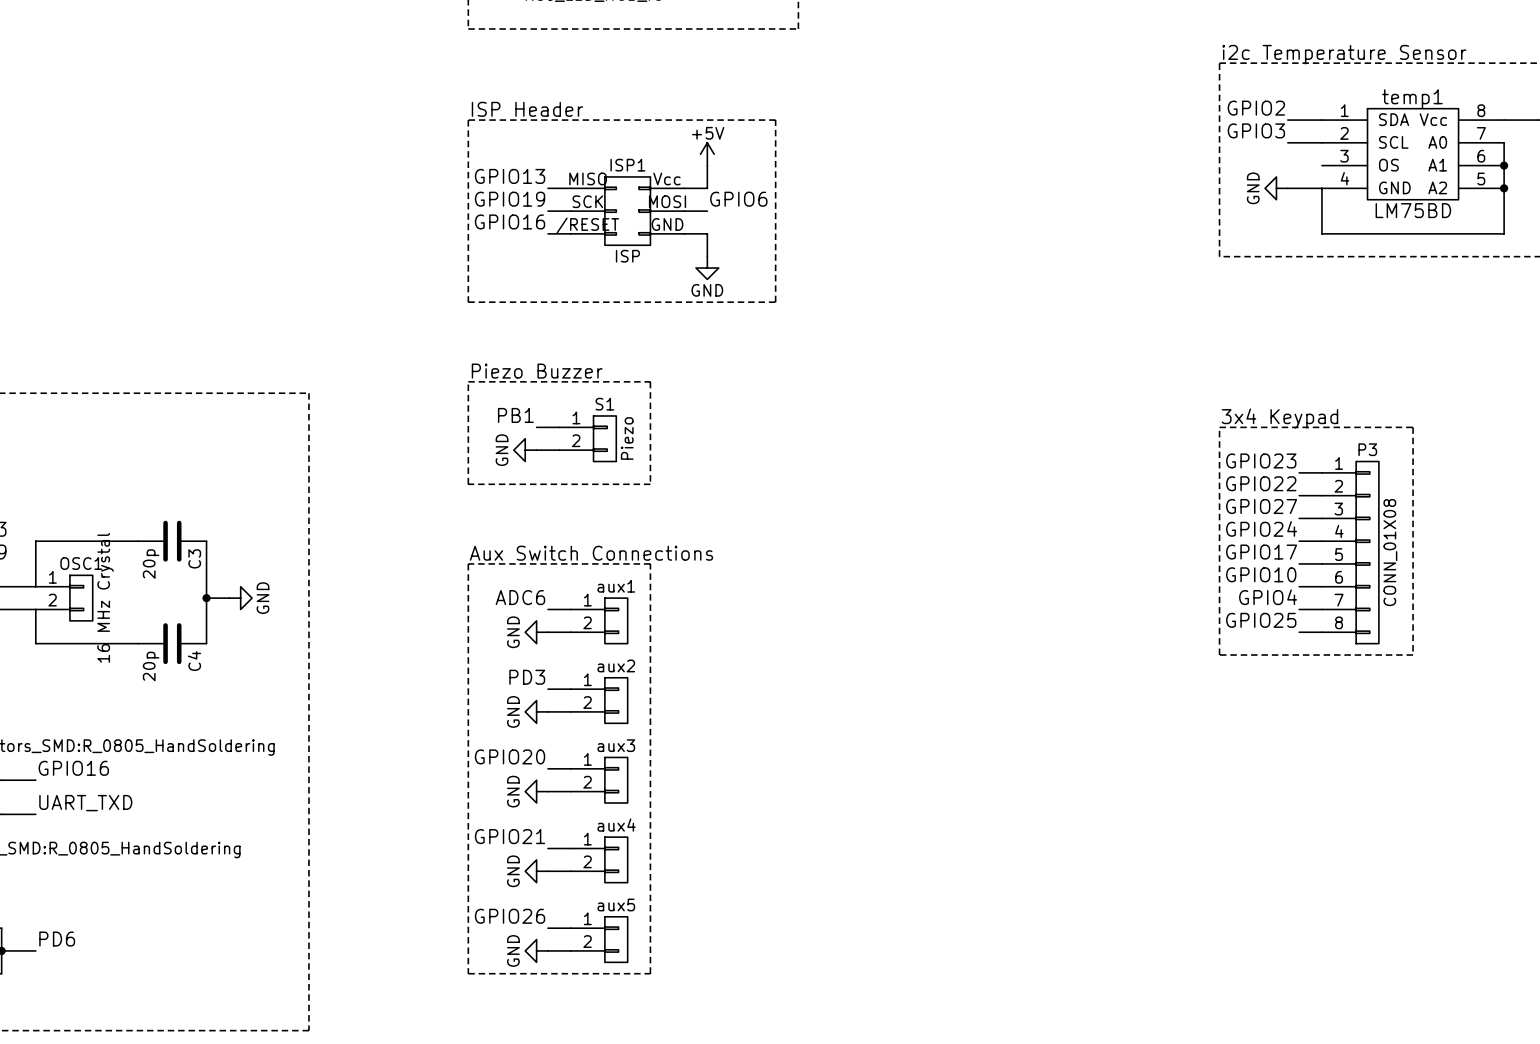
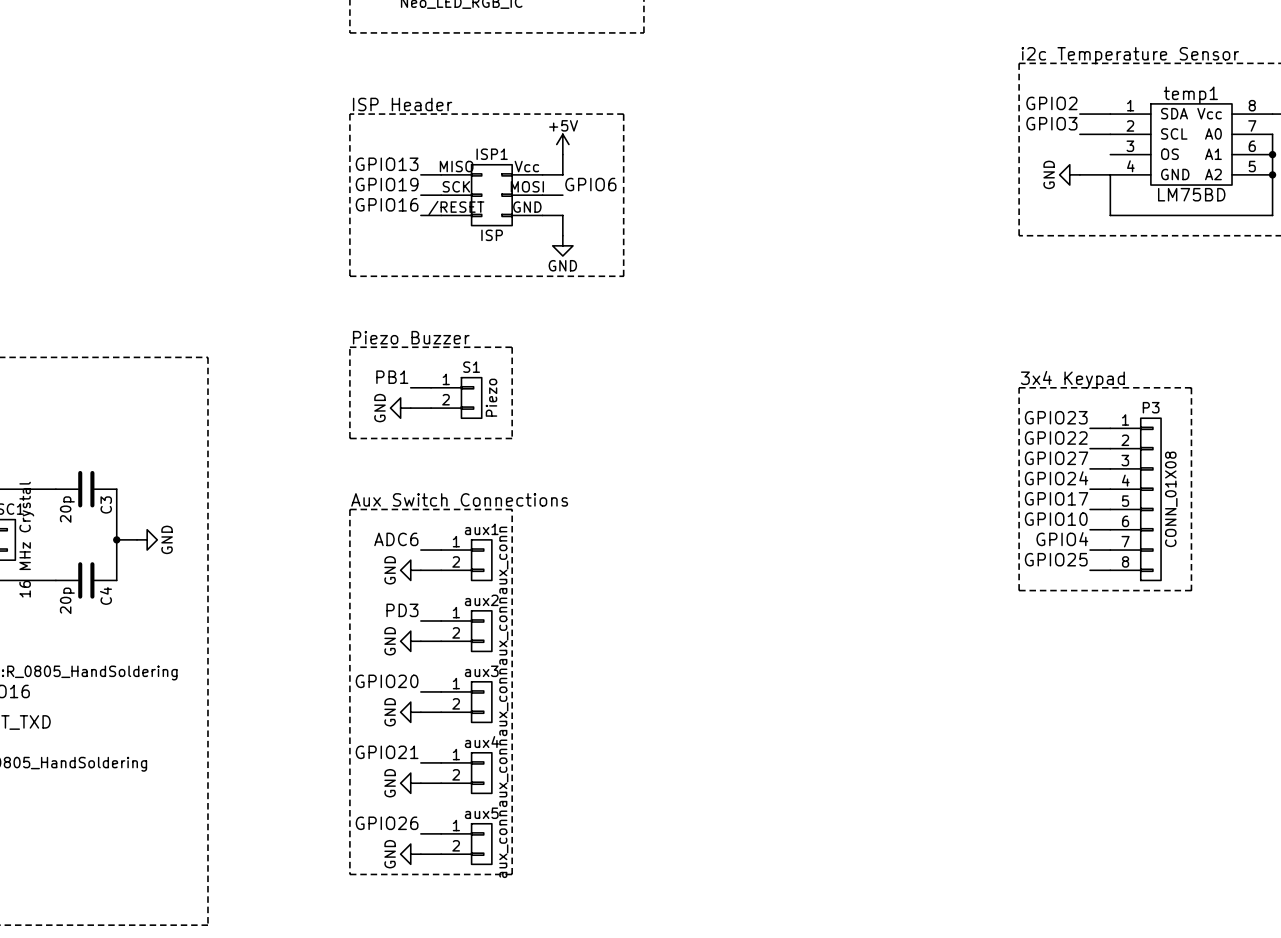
aux1 value: none -> aux_conn (503, 560)
aux2 value: none -> aux_conn (503, 631)
aux3 value: none -> aux_conn (503, 702)
aux4 value: none -> aux_conn (503, 773)
aux5 value: none -> aux_conn (503, 844)

